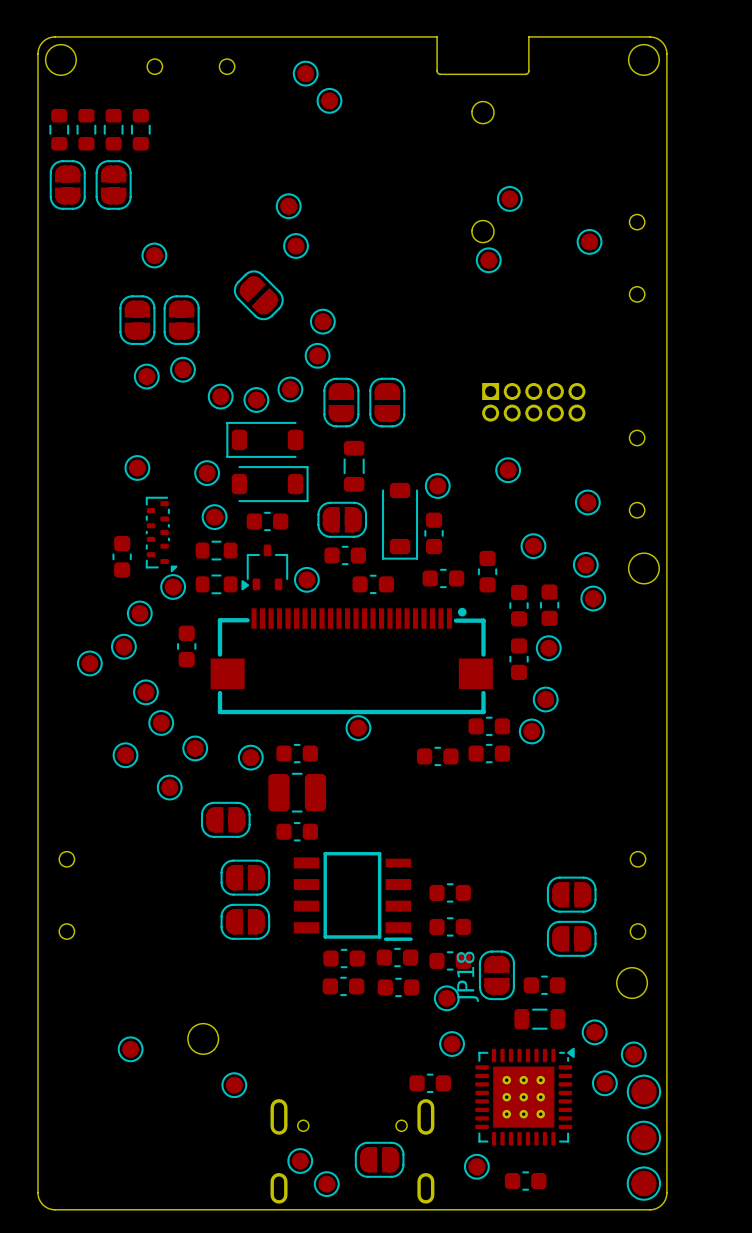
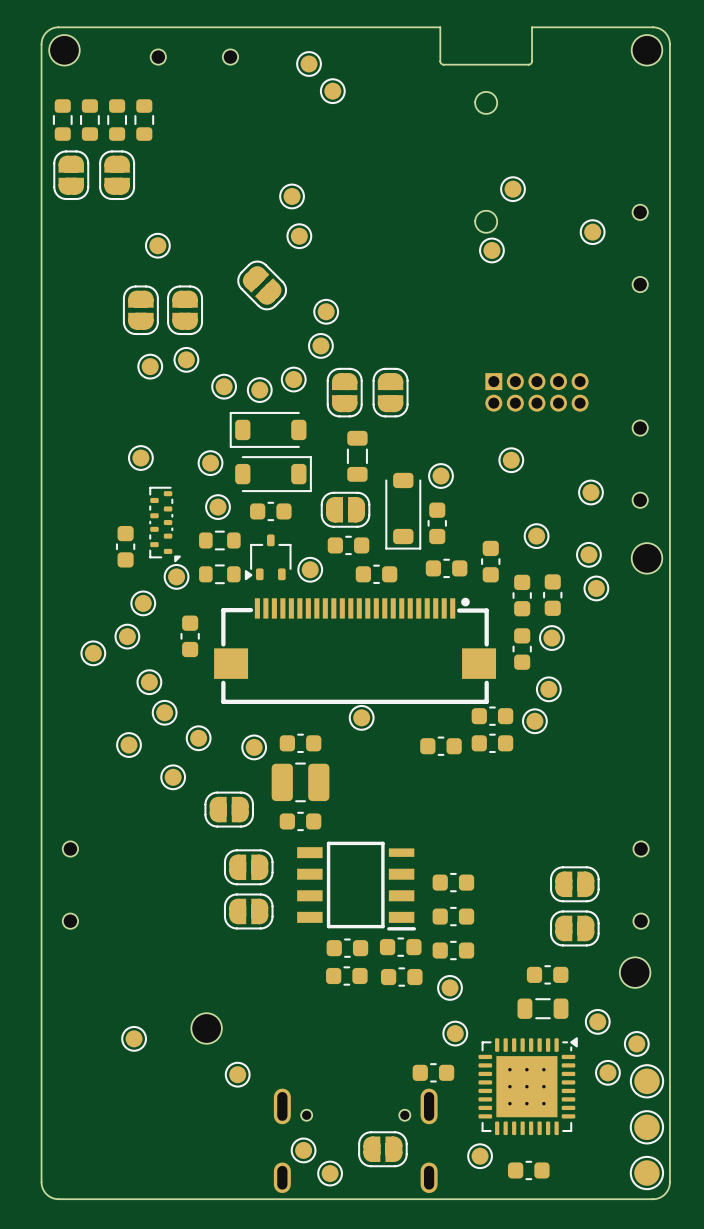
JP18: (496, 975) -> none

